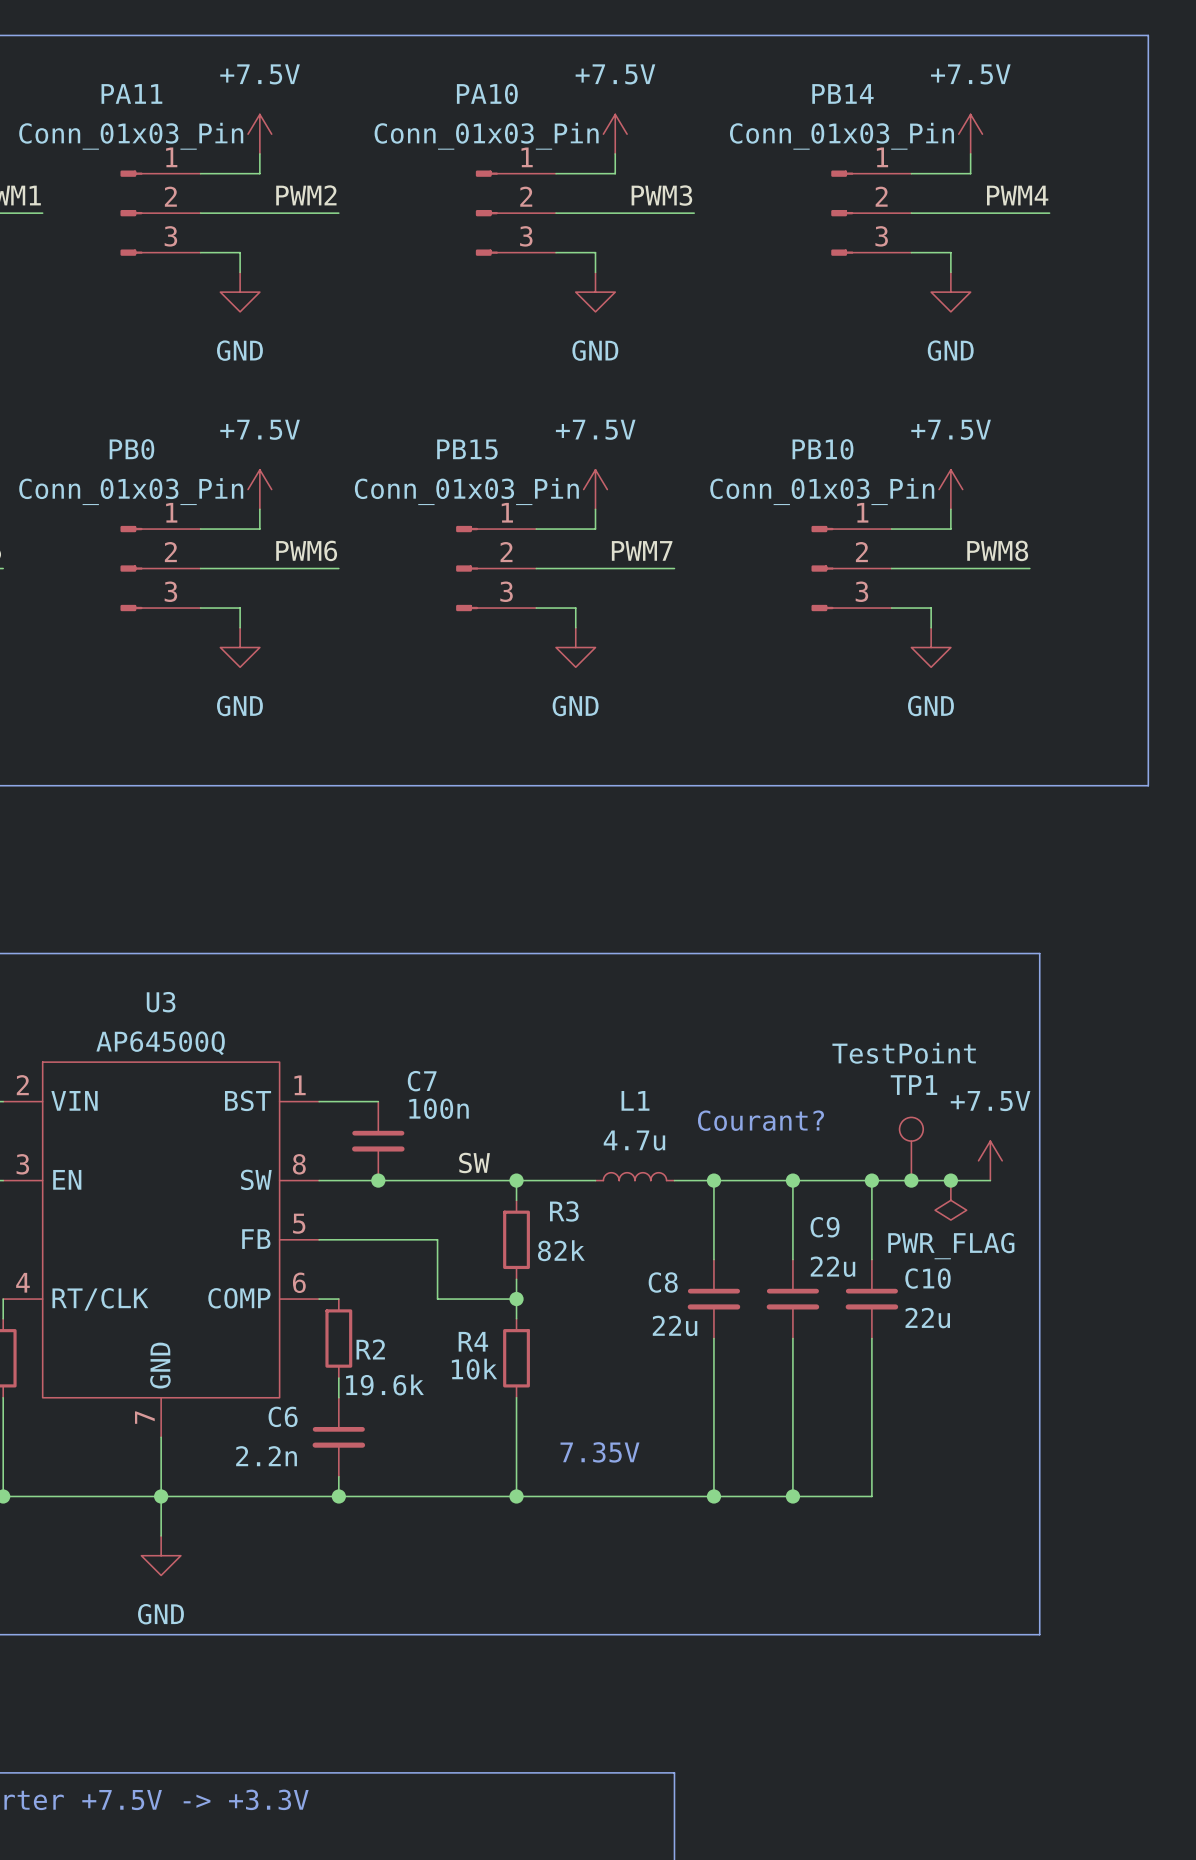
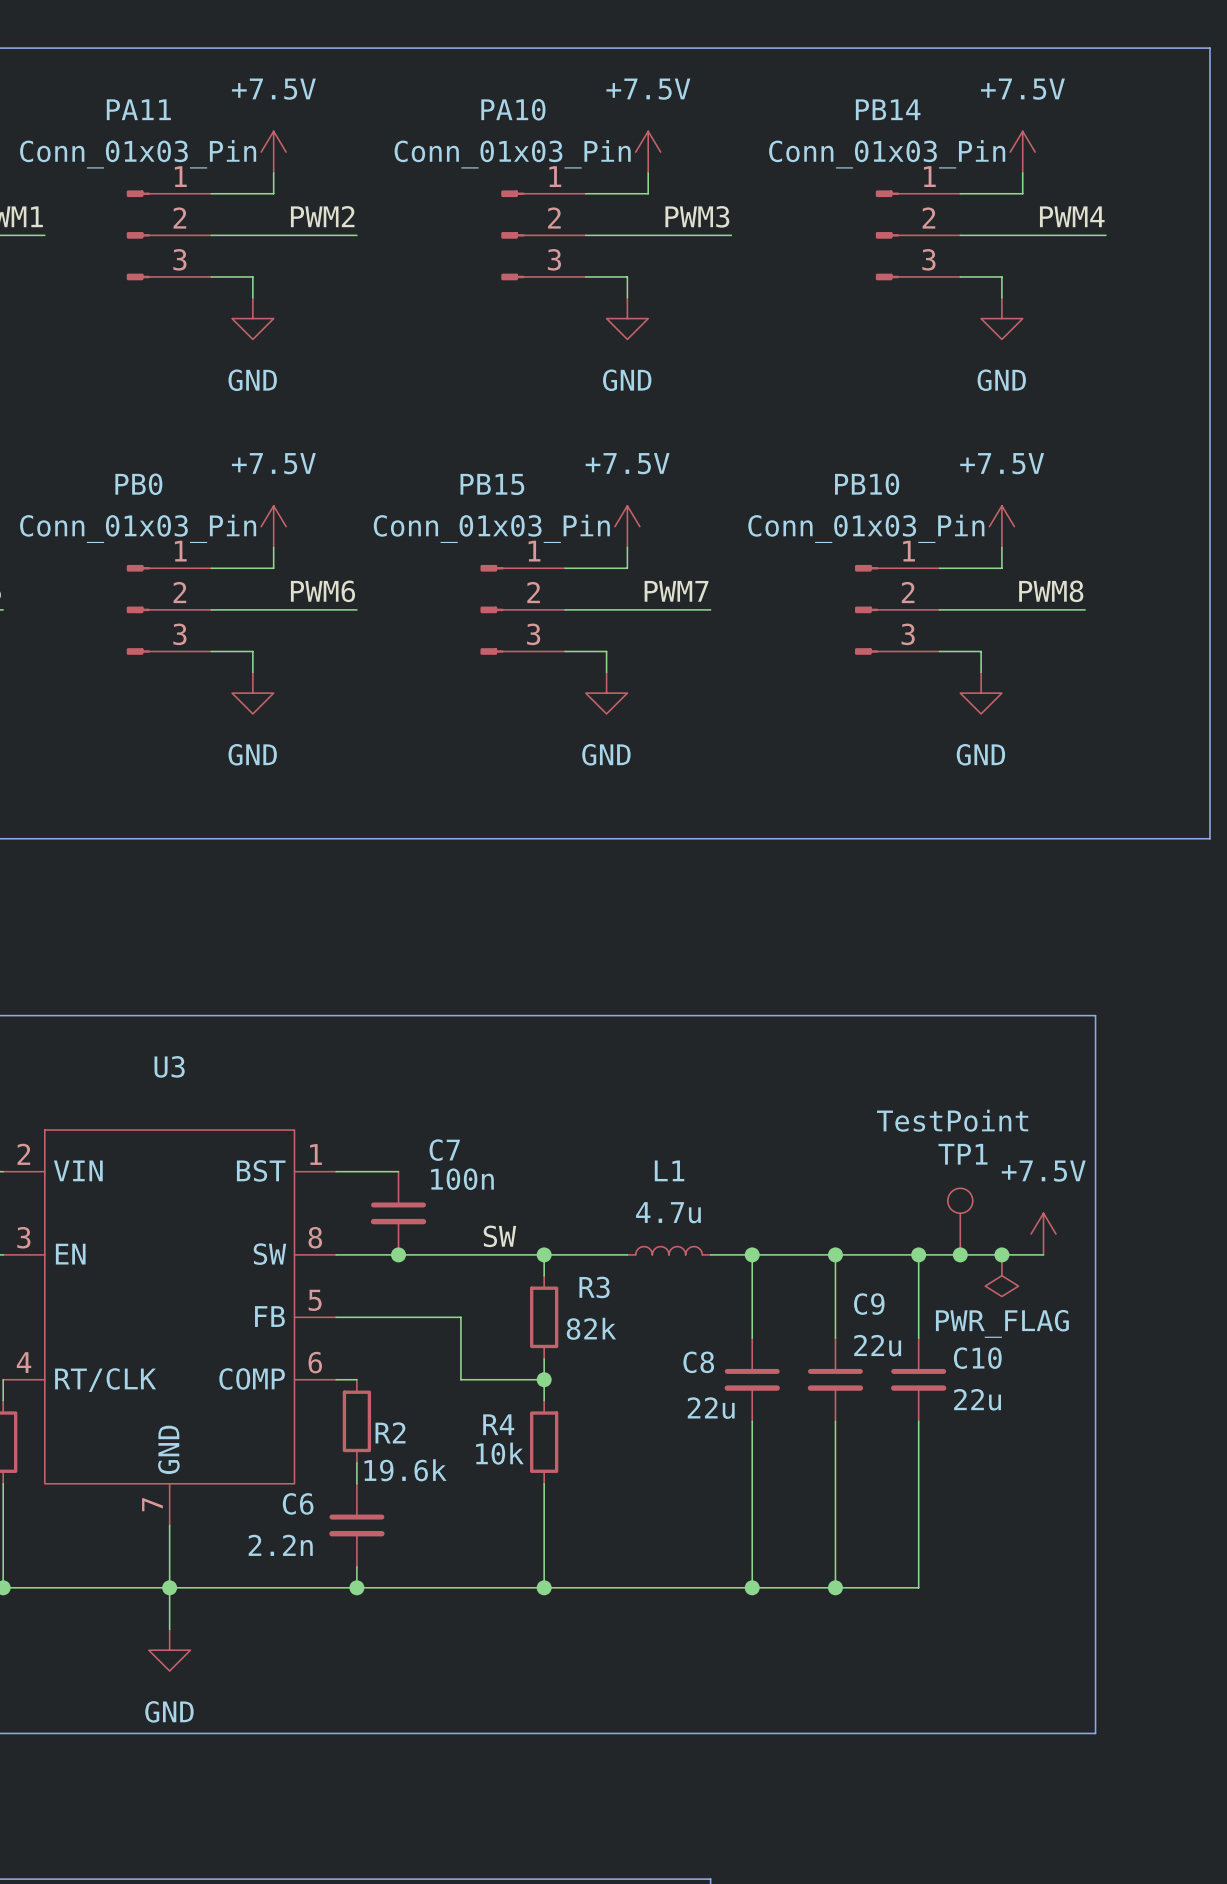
U3 value: AP64500Q (160, 1043) -> none
text: Courant? (760, 1120) -> none
text: 7.35V (599, 1452) -> none

